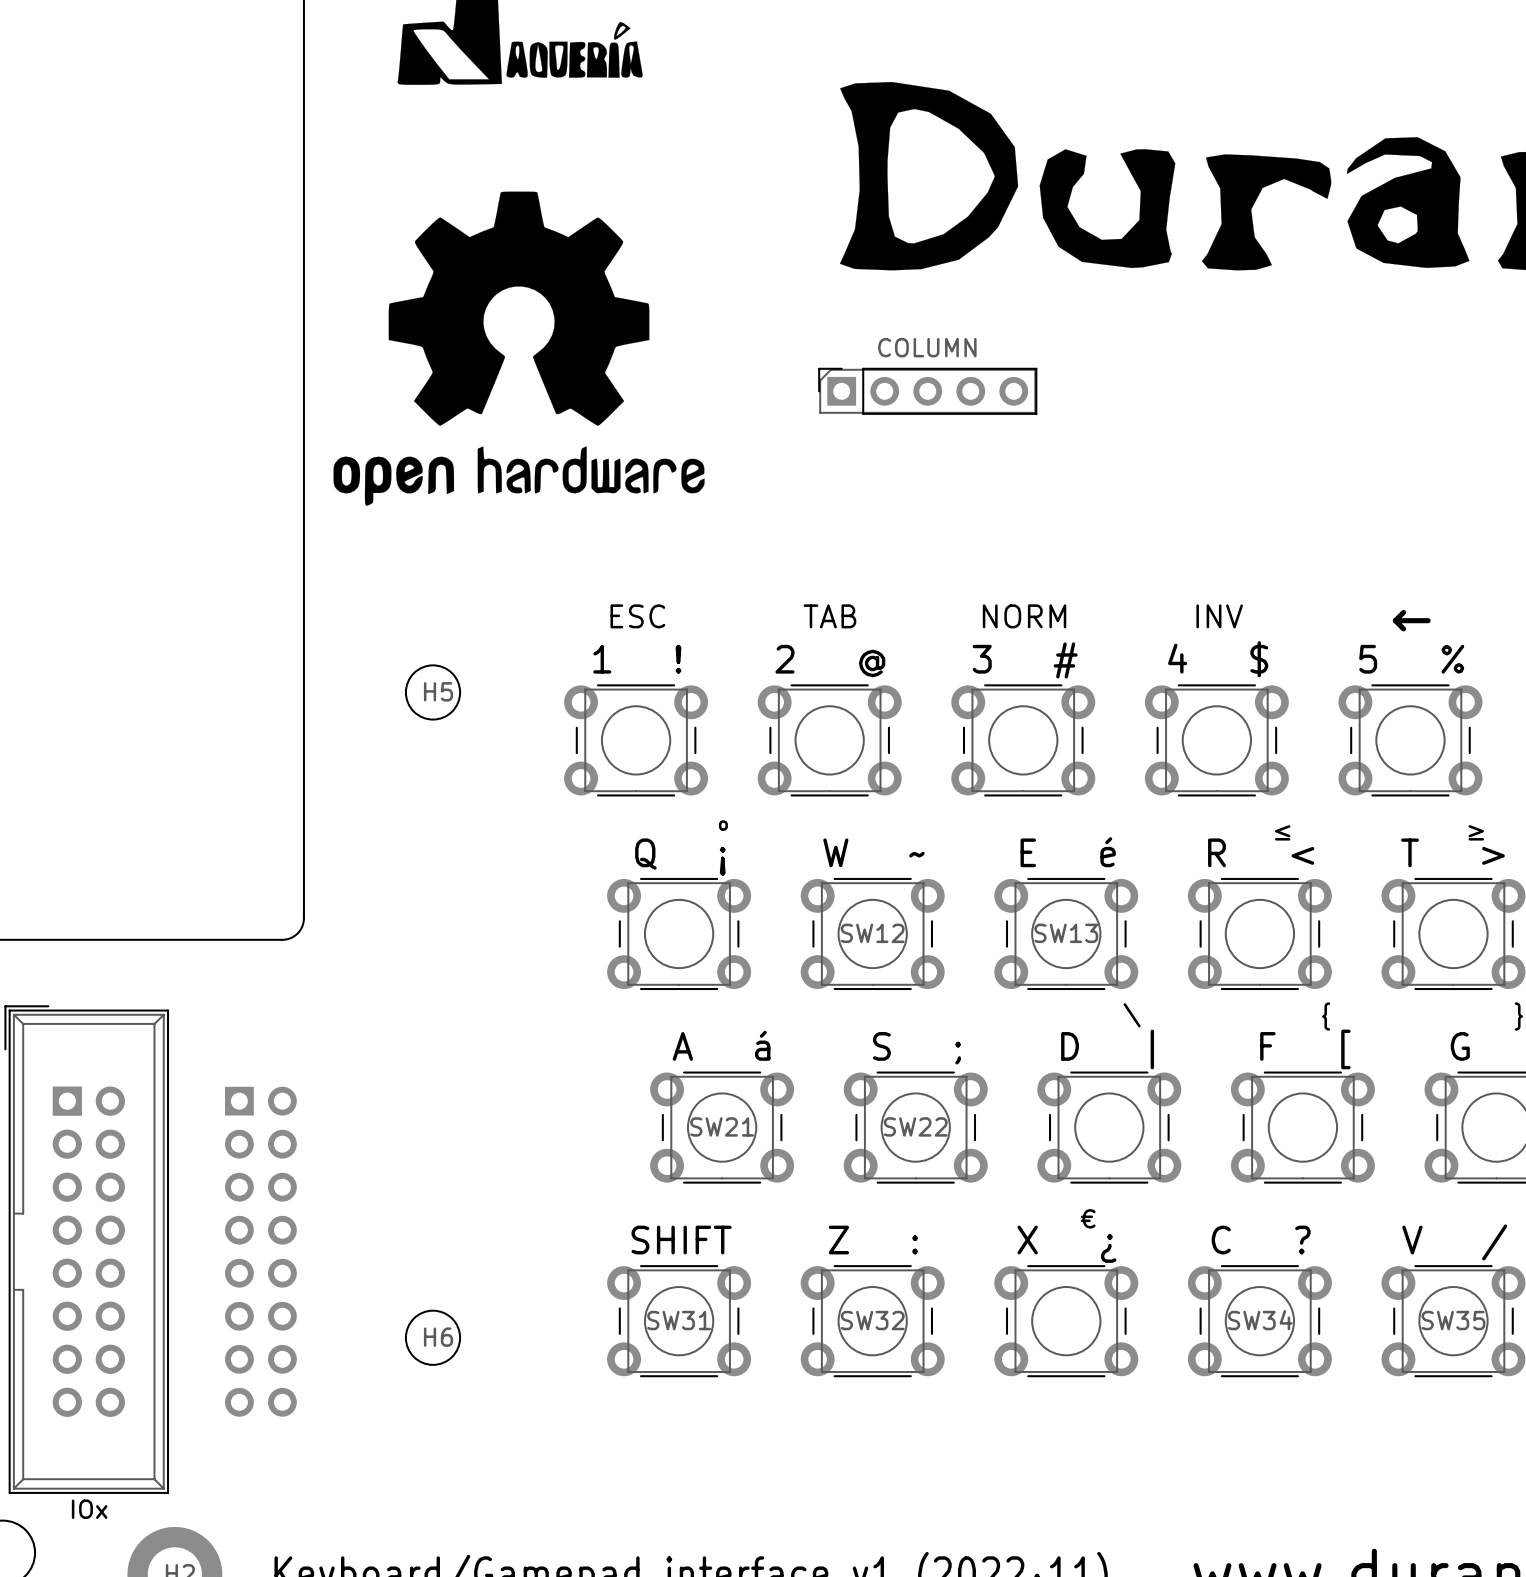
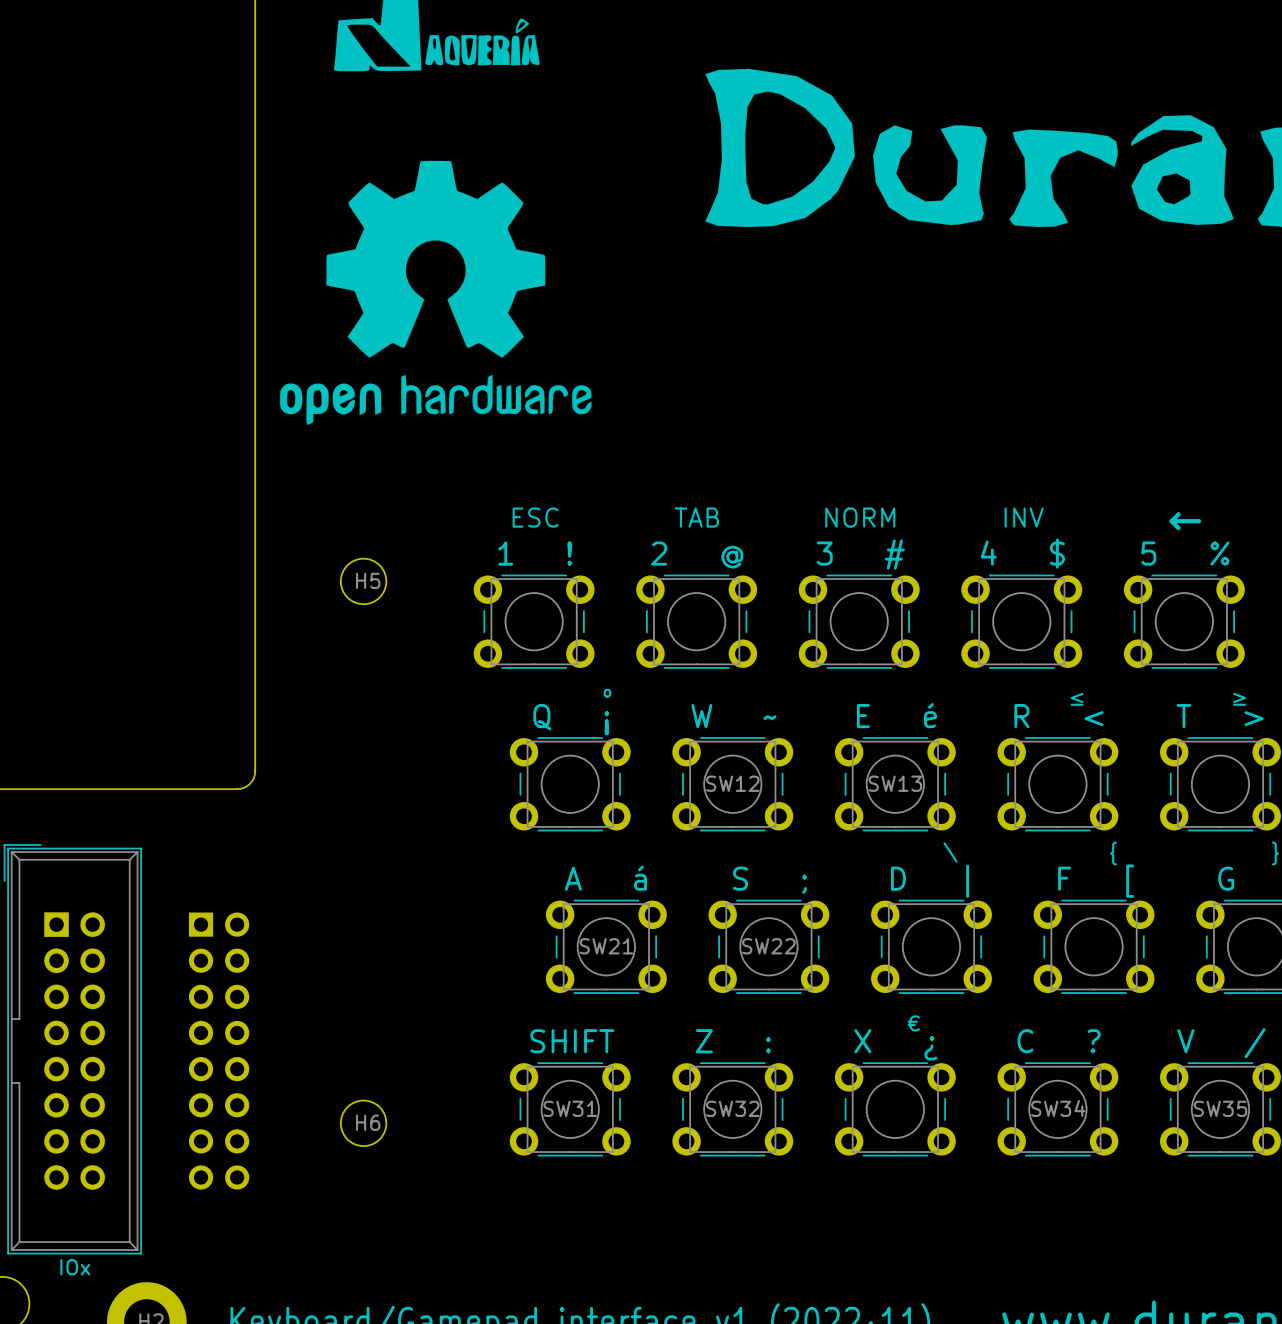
part: COLUMN (927, 391) -> none

